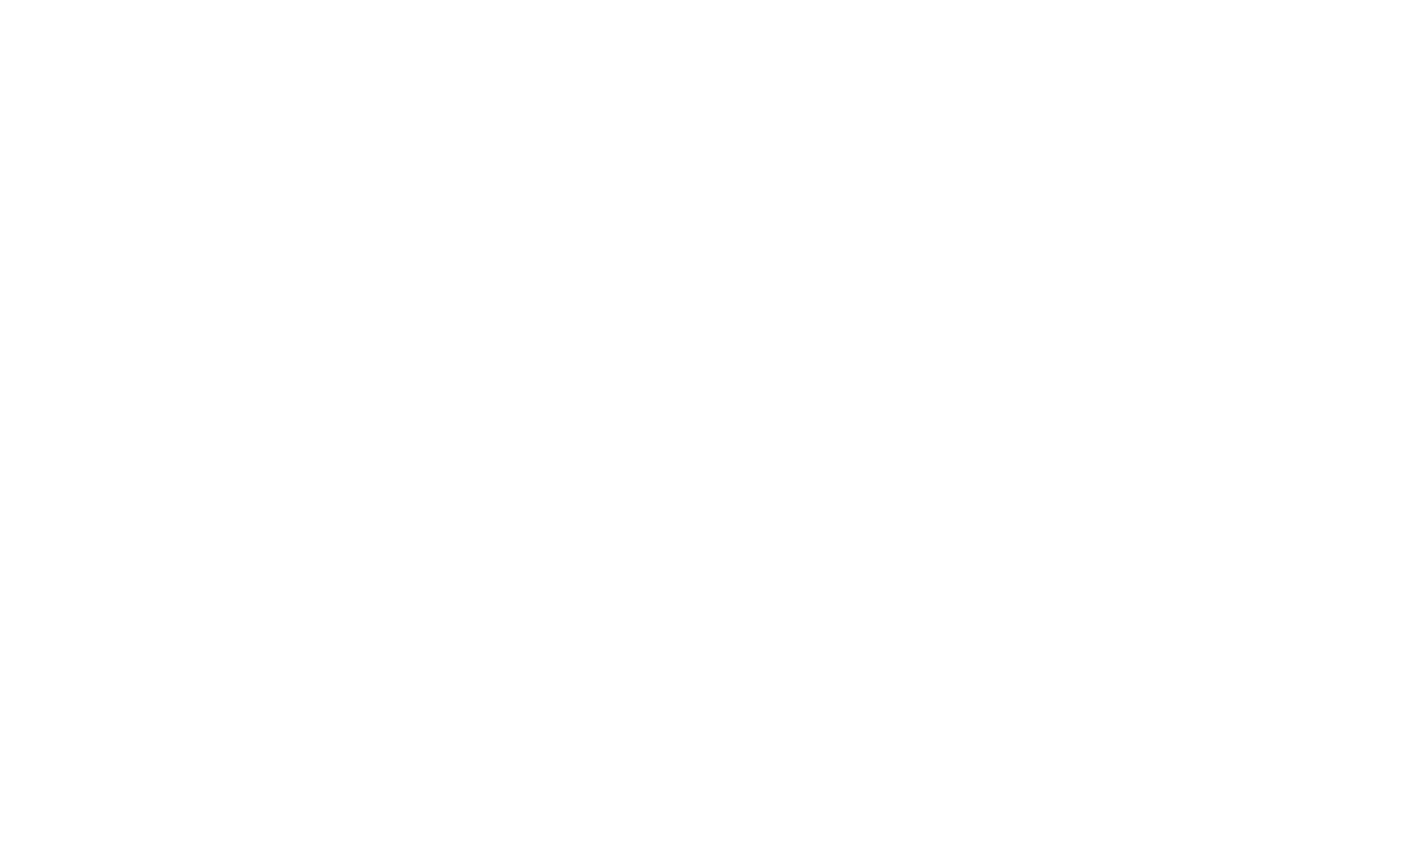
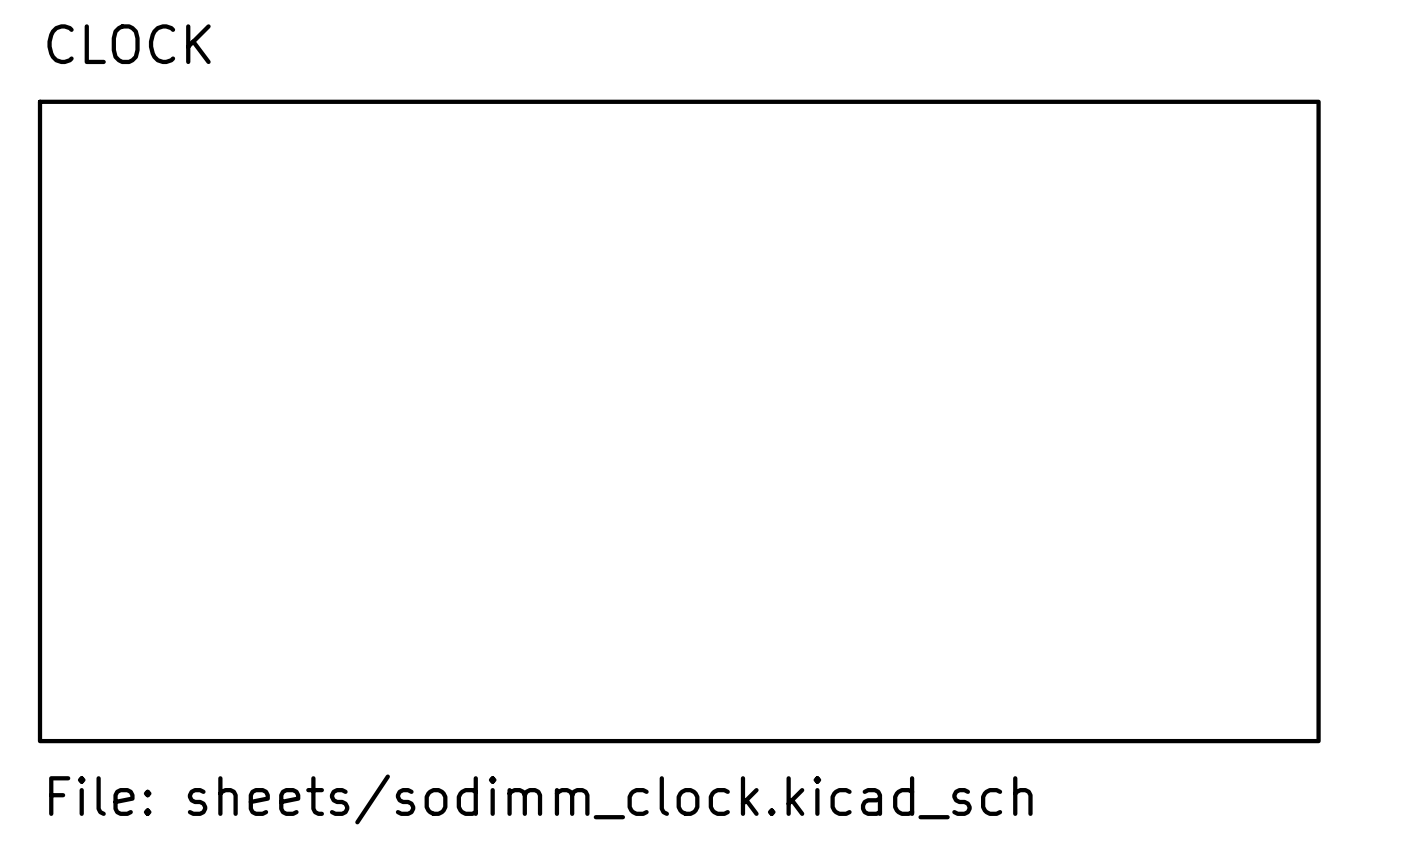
sheet CLOCK: none -> File: sheets/sodimm_clock.kicad_sch (679, 421)

